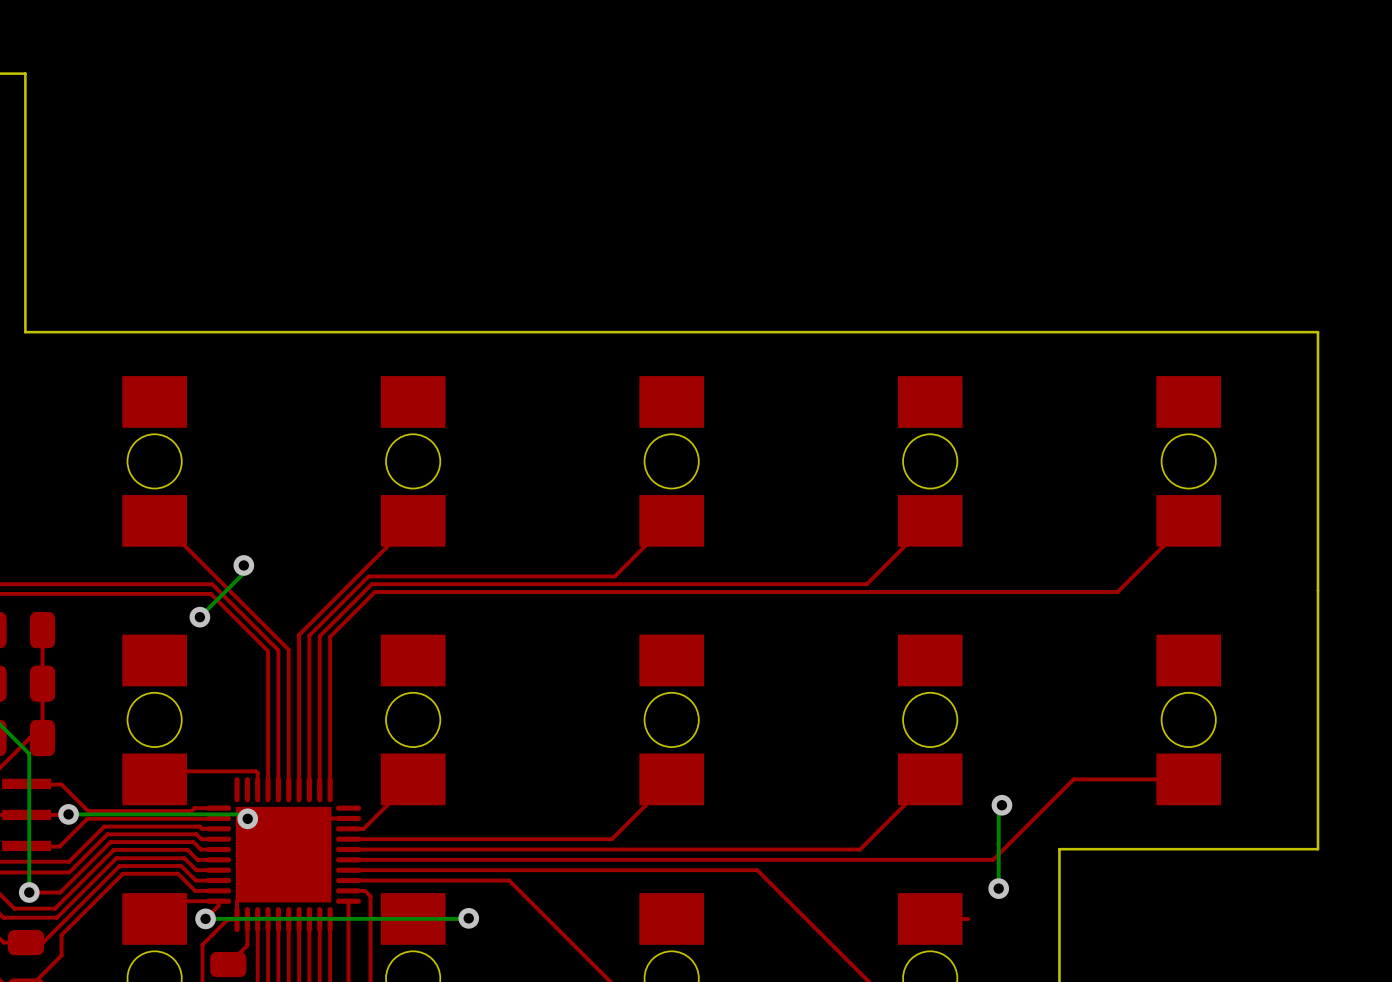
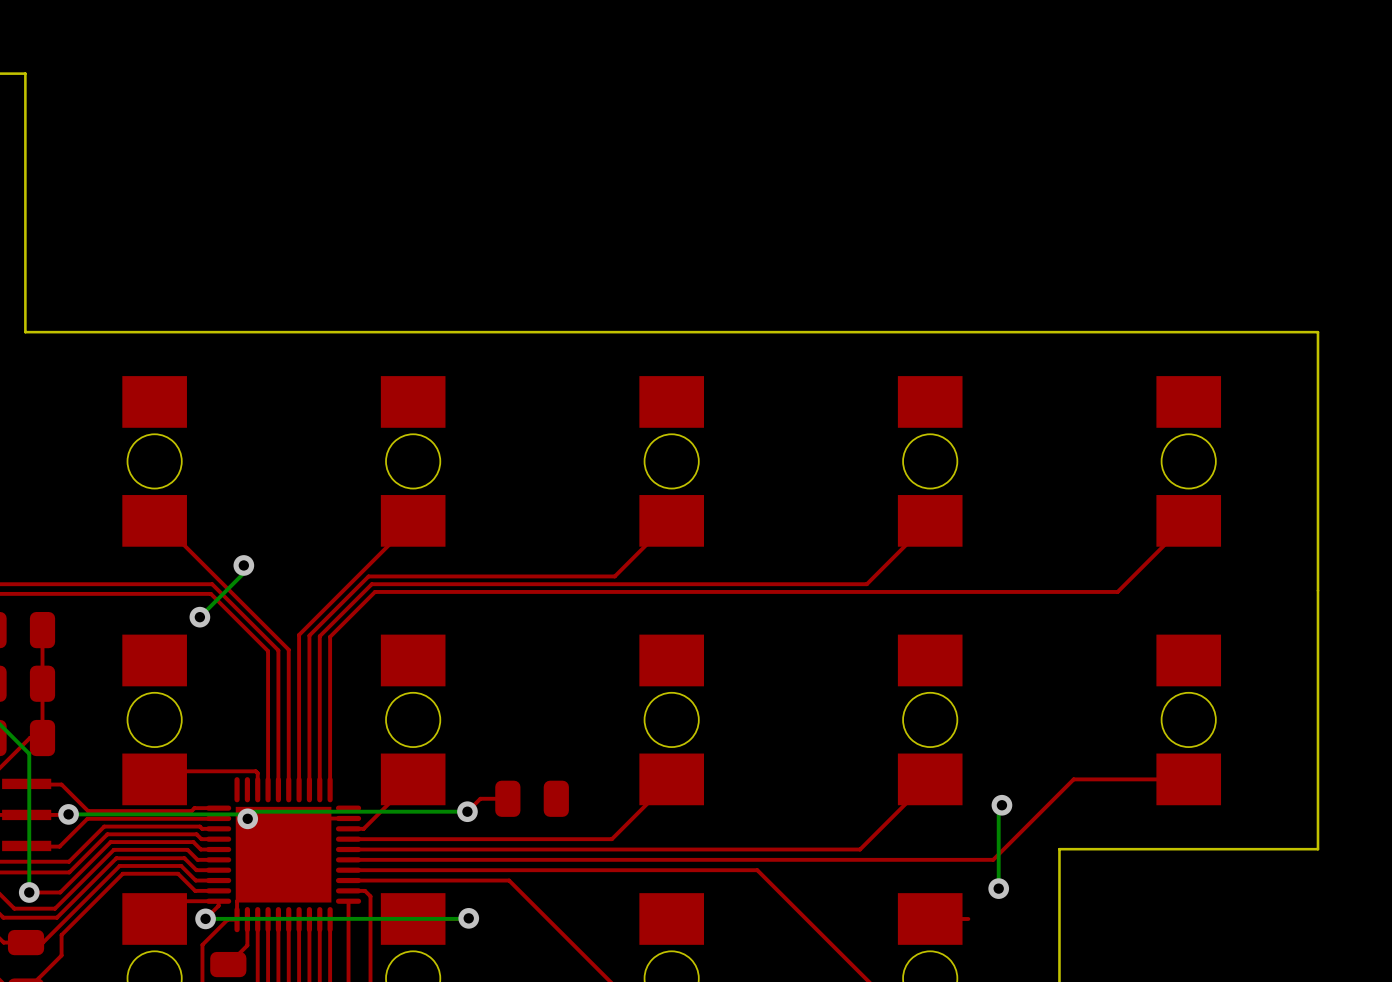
top track: none -> (507, 798) (480, 798) (467, 811)
part: none -> (532, 798)
bottom track: none -> (467, 811) (254, 811) (247, 818)
via: none -> (467, 811)

